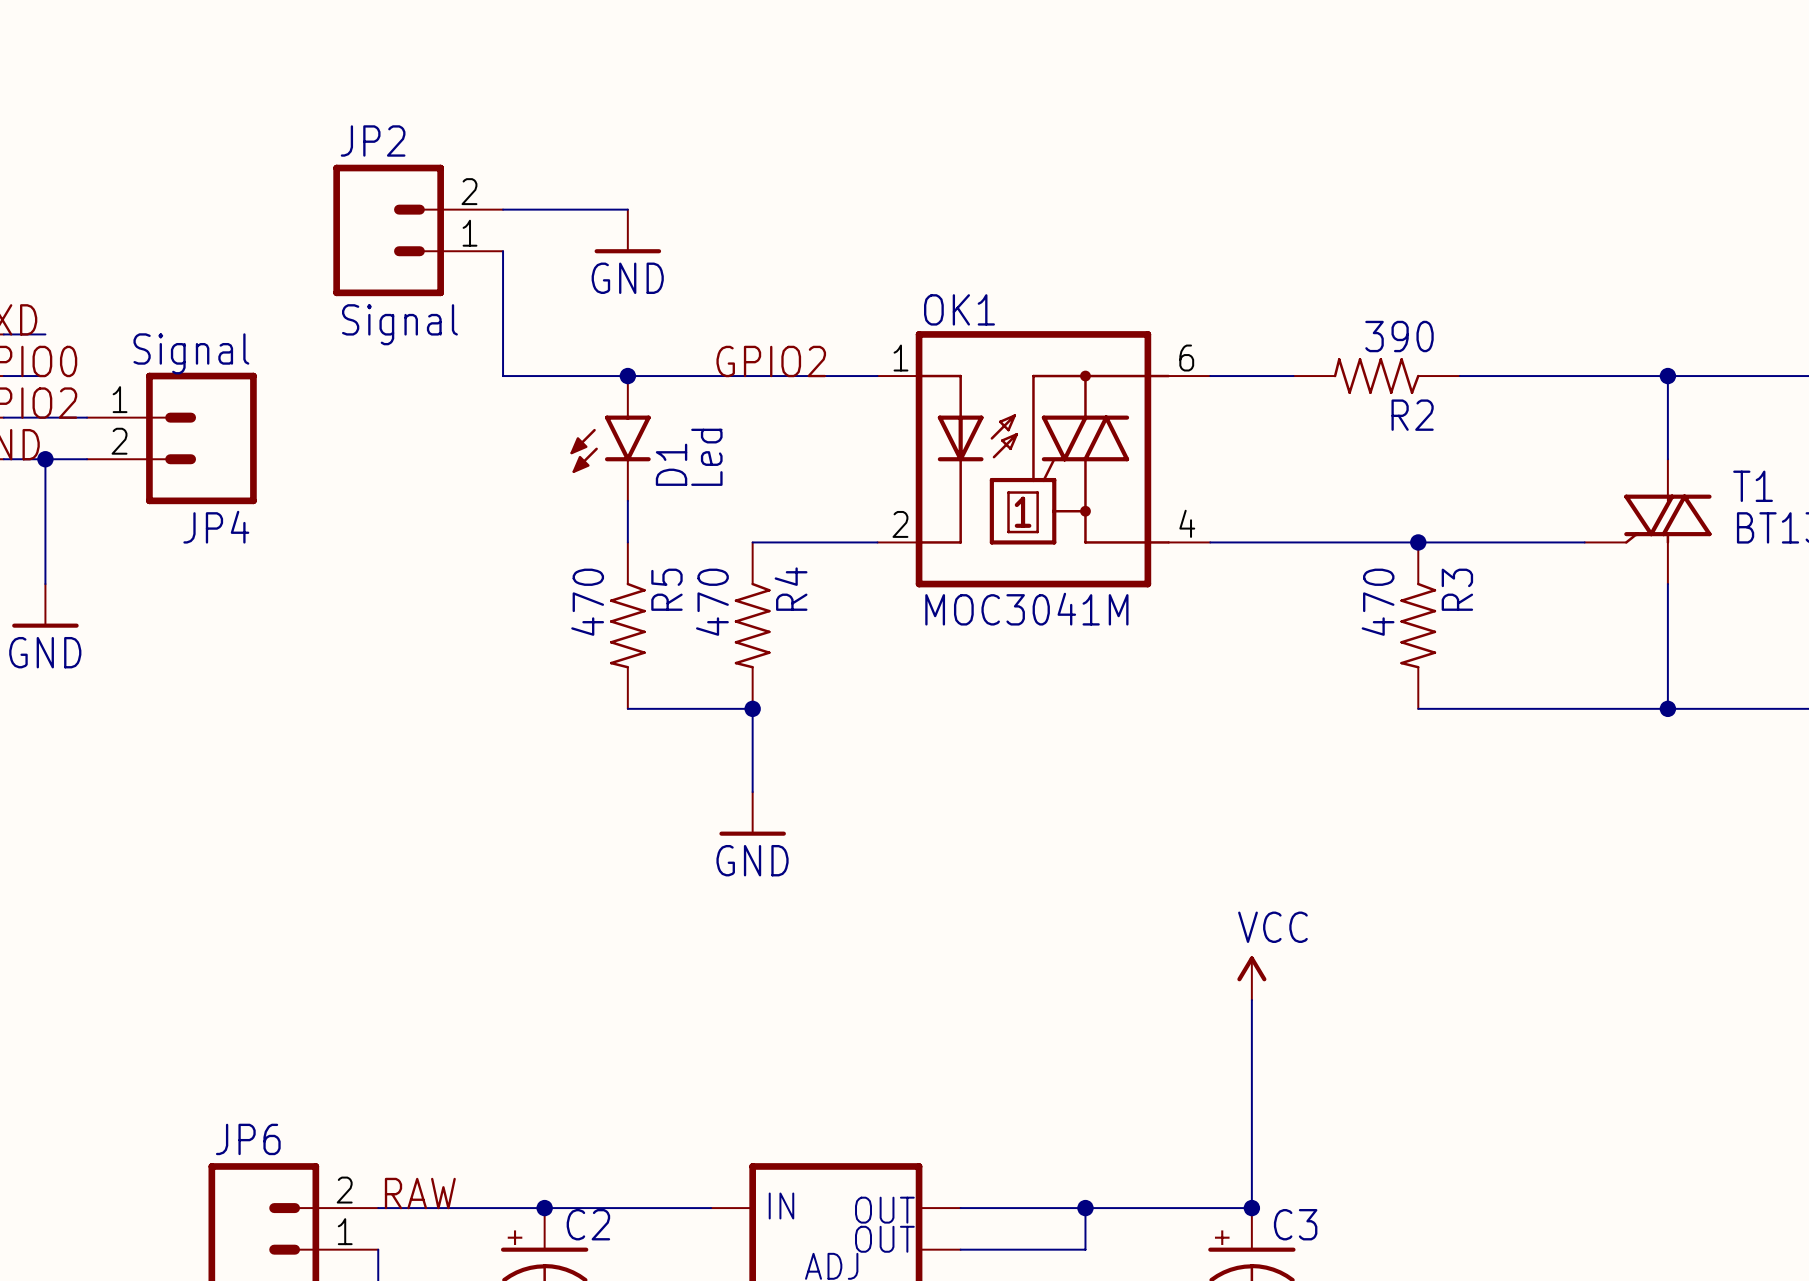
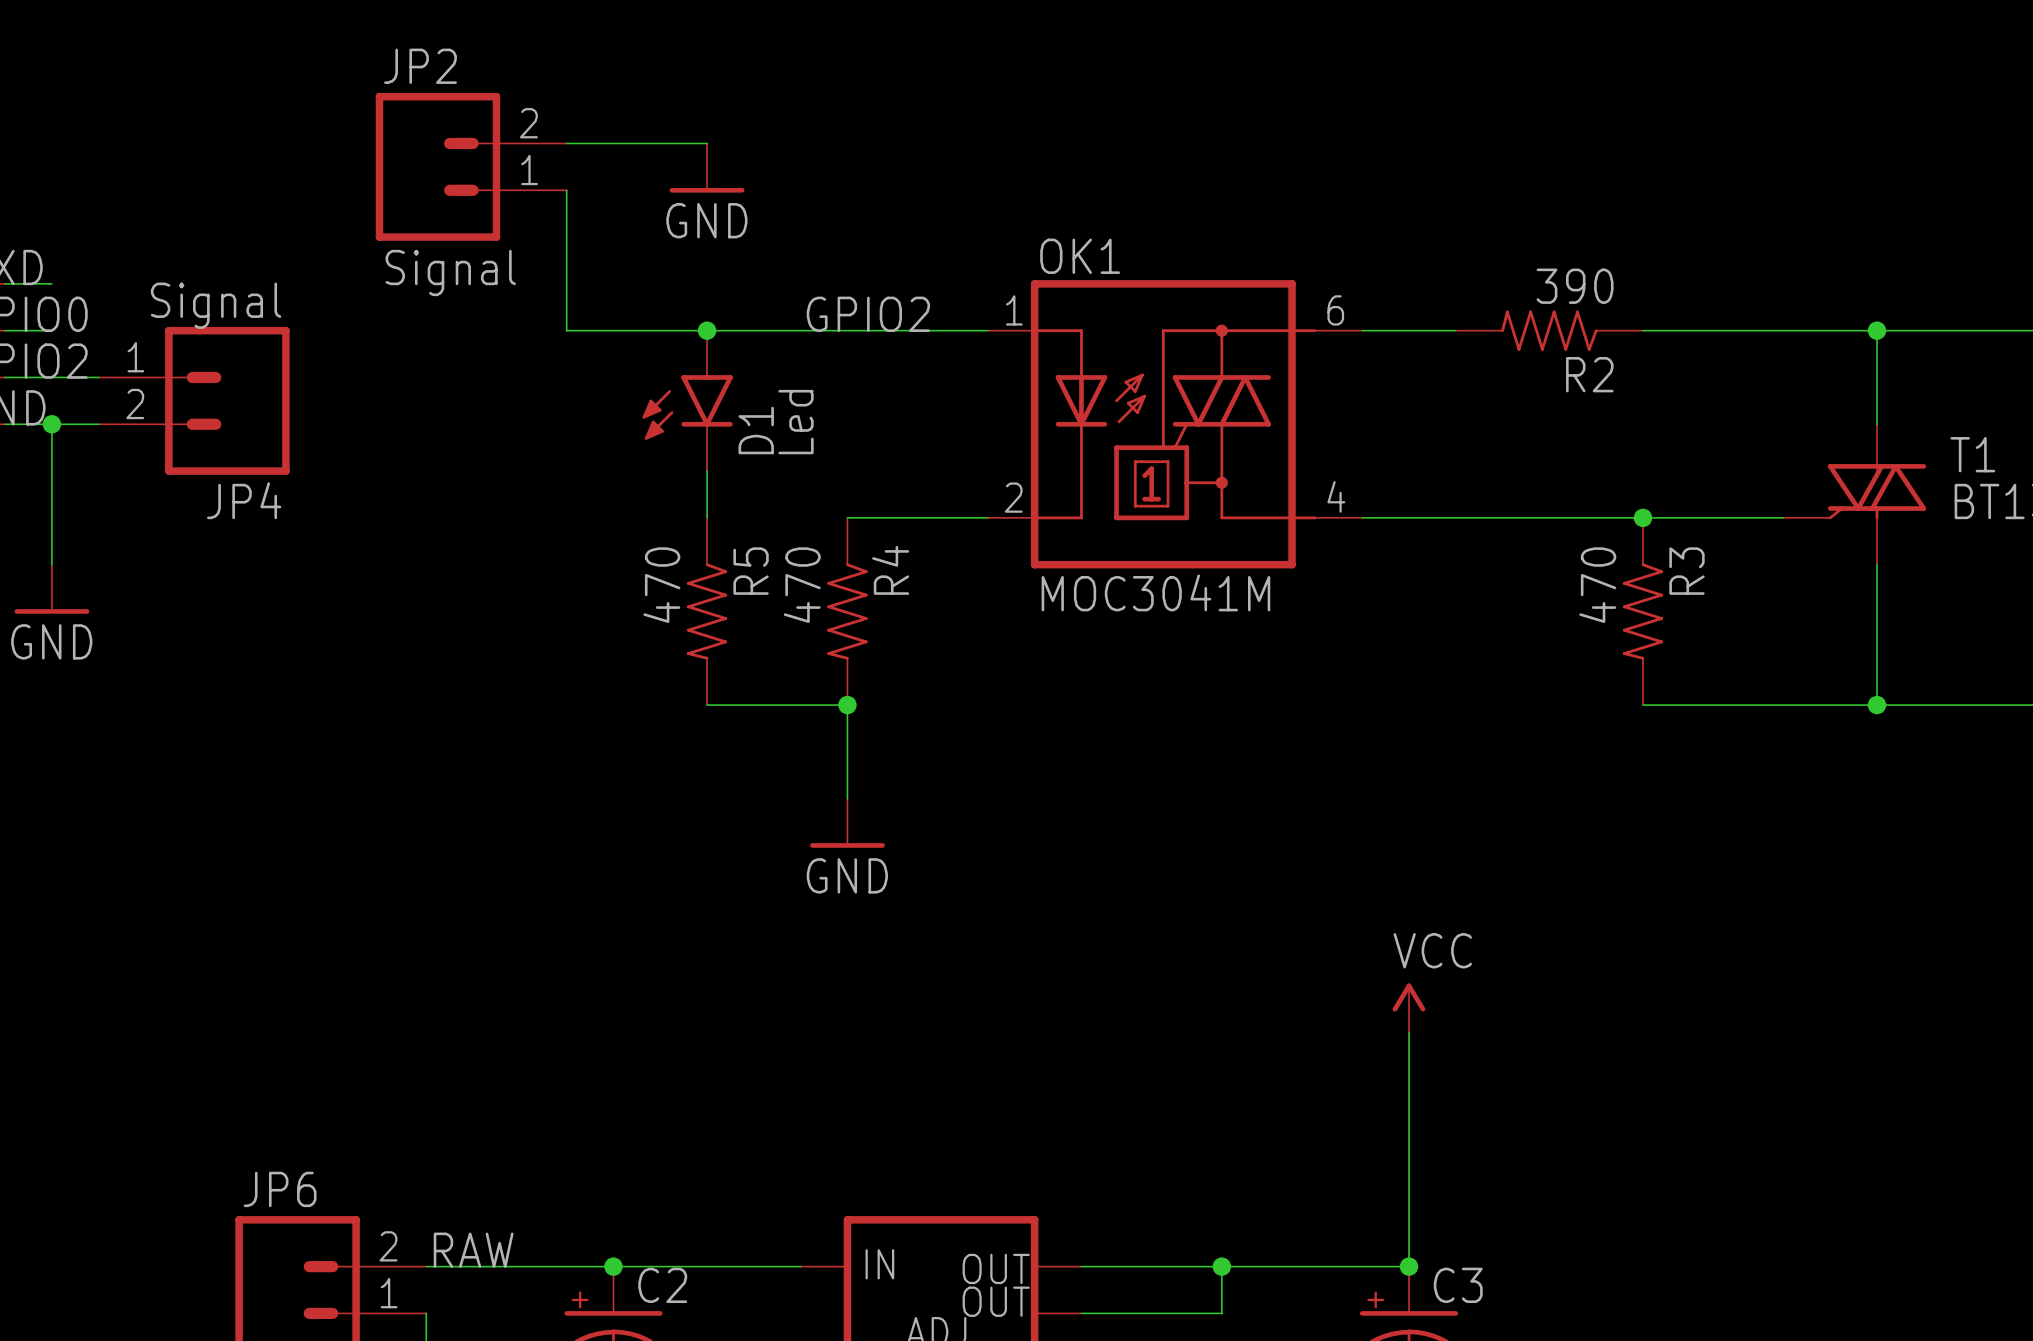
junction position: (1418, 542) -> (1643, 517)
R3 position: (1418, 625) -> (1643, 611)
wire: (1418, 708) (1459, 708) -> none

